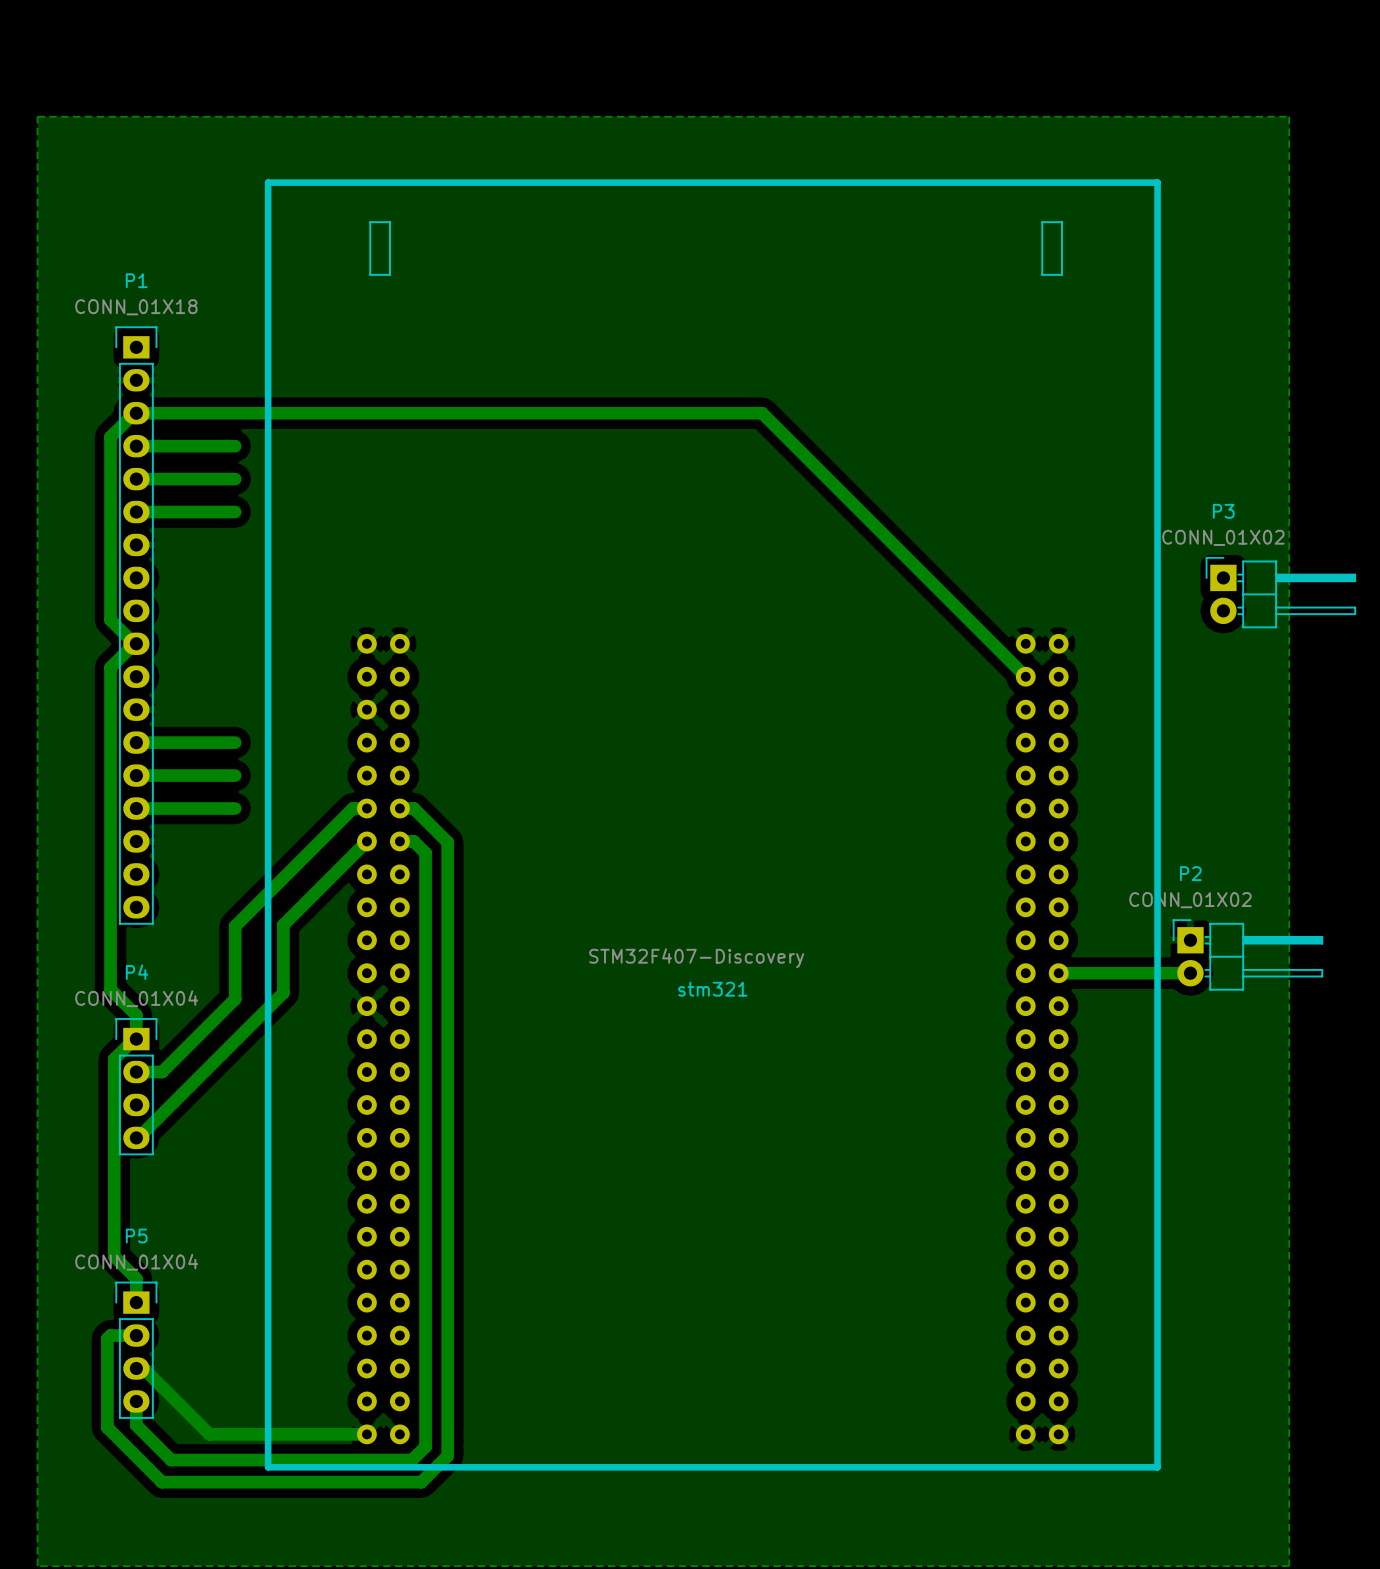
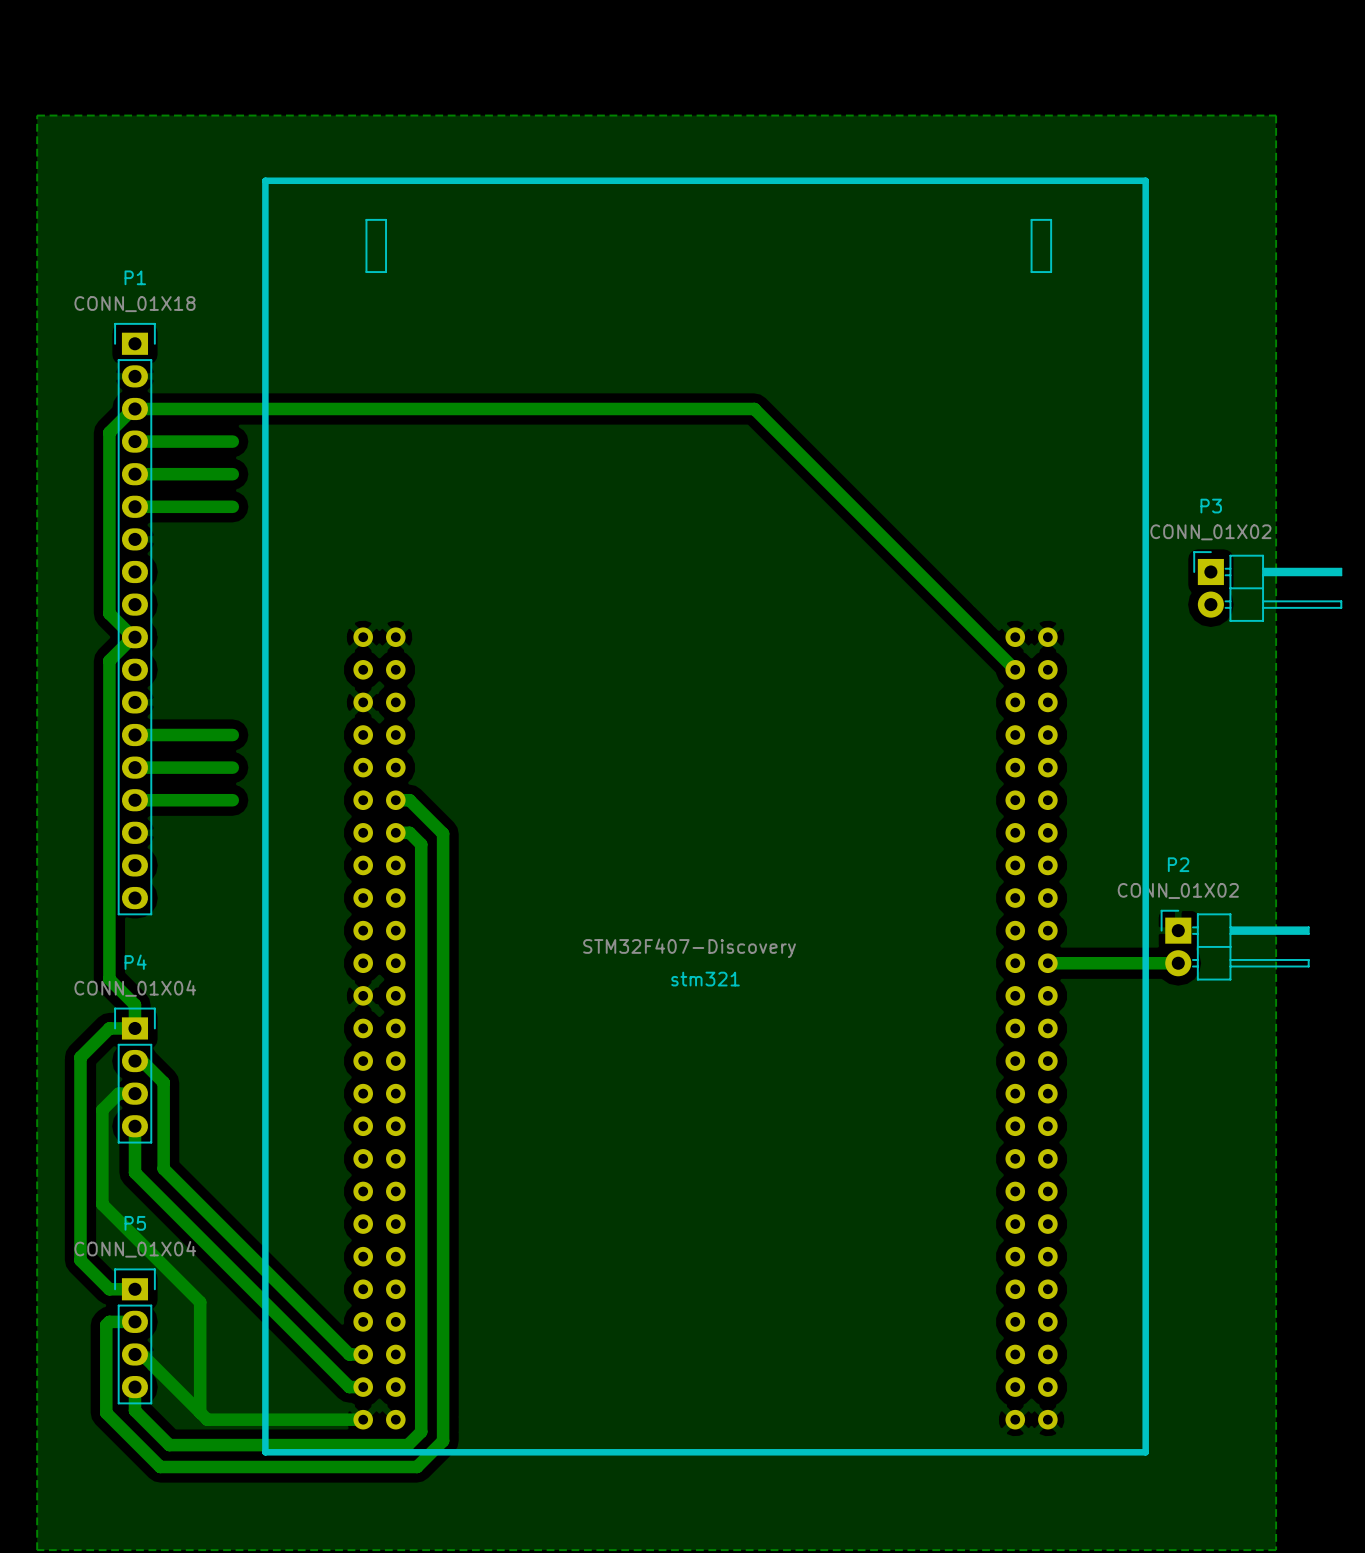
bottom track: (366, 808) (352, 808) (235, 926) (235, 999) (162, 1072) (143, 1072) -> (363, 1354) (349, 1354) (163, 1168) (163, 1082) (142, 1061)
bottom track: (366, 841) (283, 925) (283, 992) (138, 1137) -> none
bottom track: (134, 1039) (114, 1059) (114, 1256) (136, 1278) (136, 1302) -> (133, 1028) (109, 1028) (80, 1057) (80, 1260) (109, 1289) (134, 1289)
bottom track: none -> (134, 1093) (118, 1093) (102, 1109) (102, 1204) (200, 1302) (200, 1412)
bottom track: none -> (135, 1126) (135, 1172) (349, 1387) (363, 1387)

